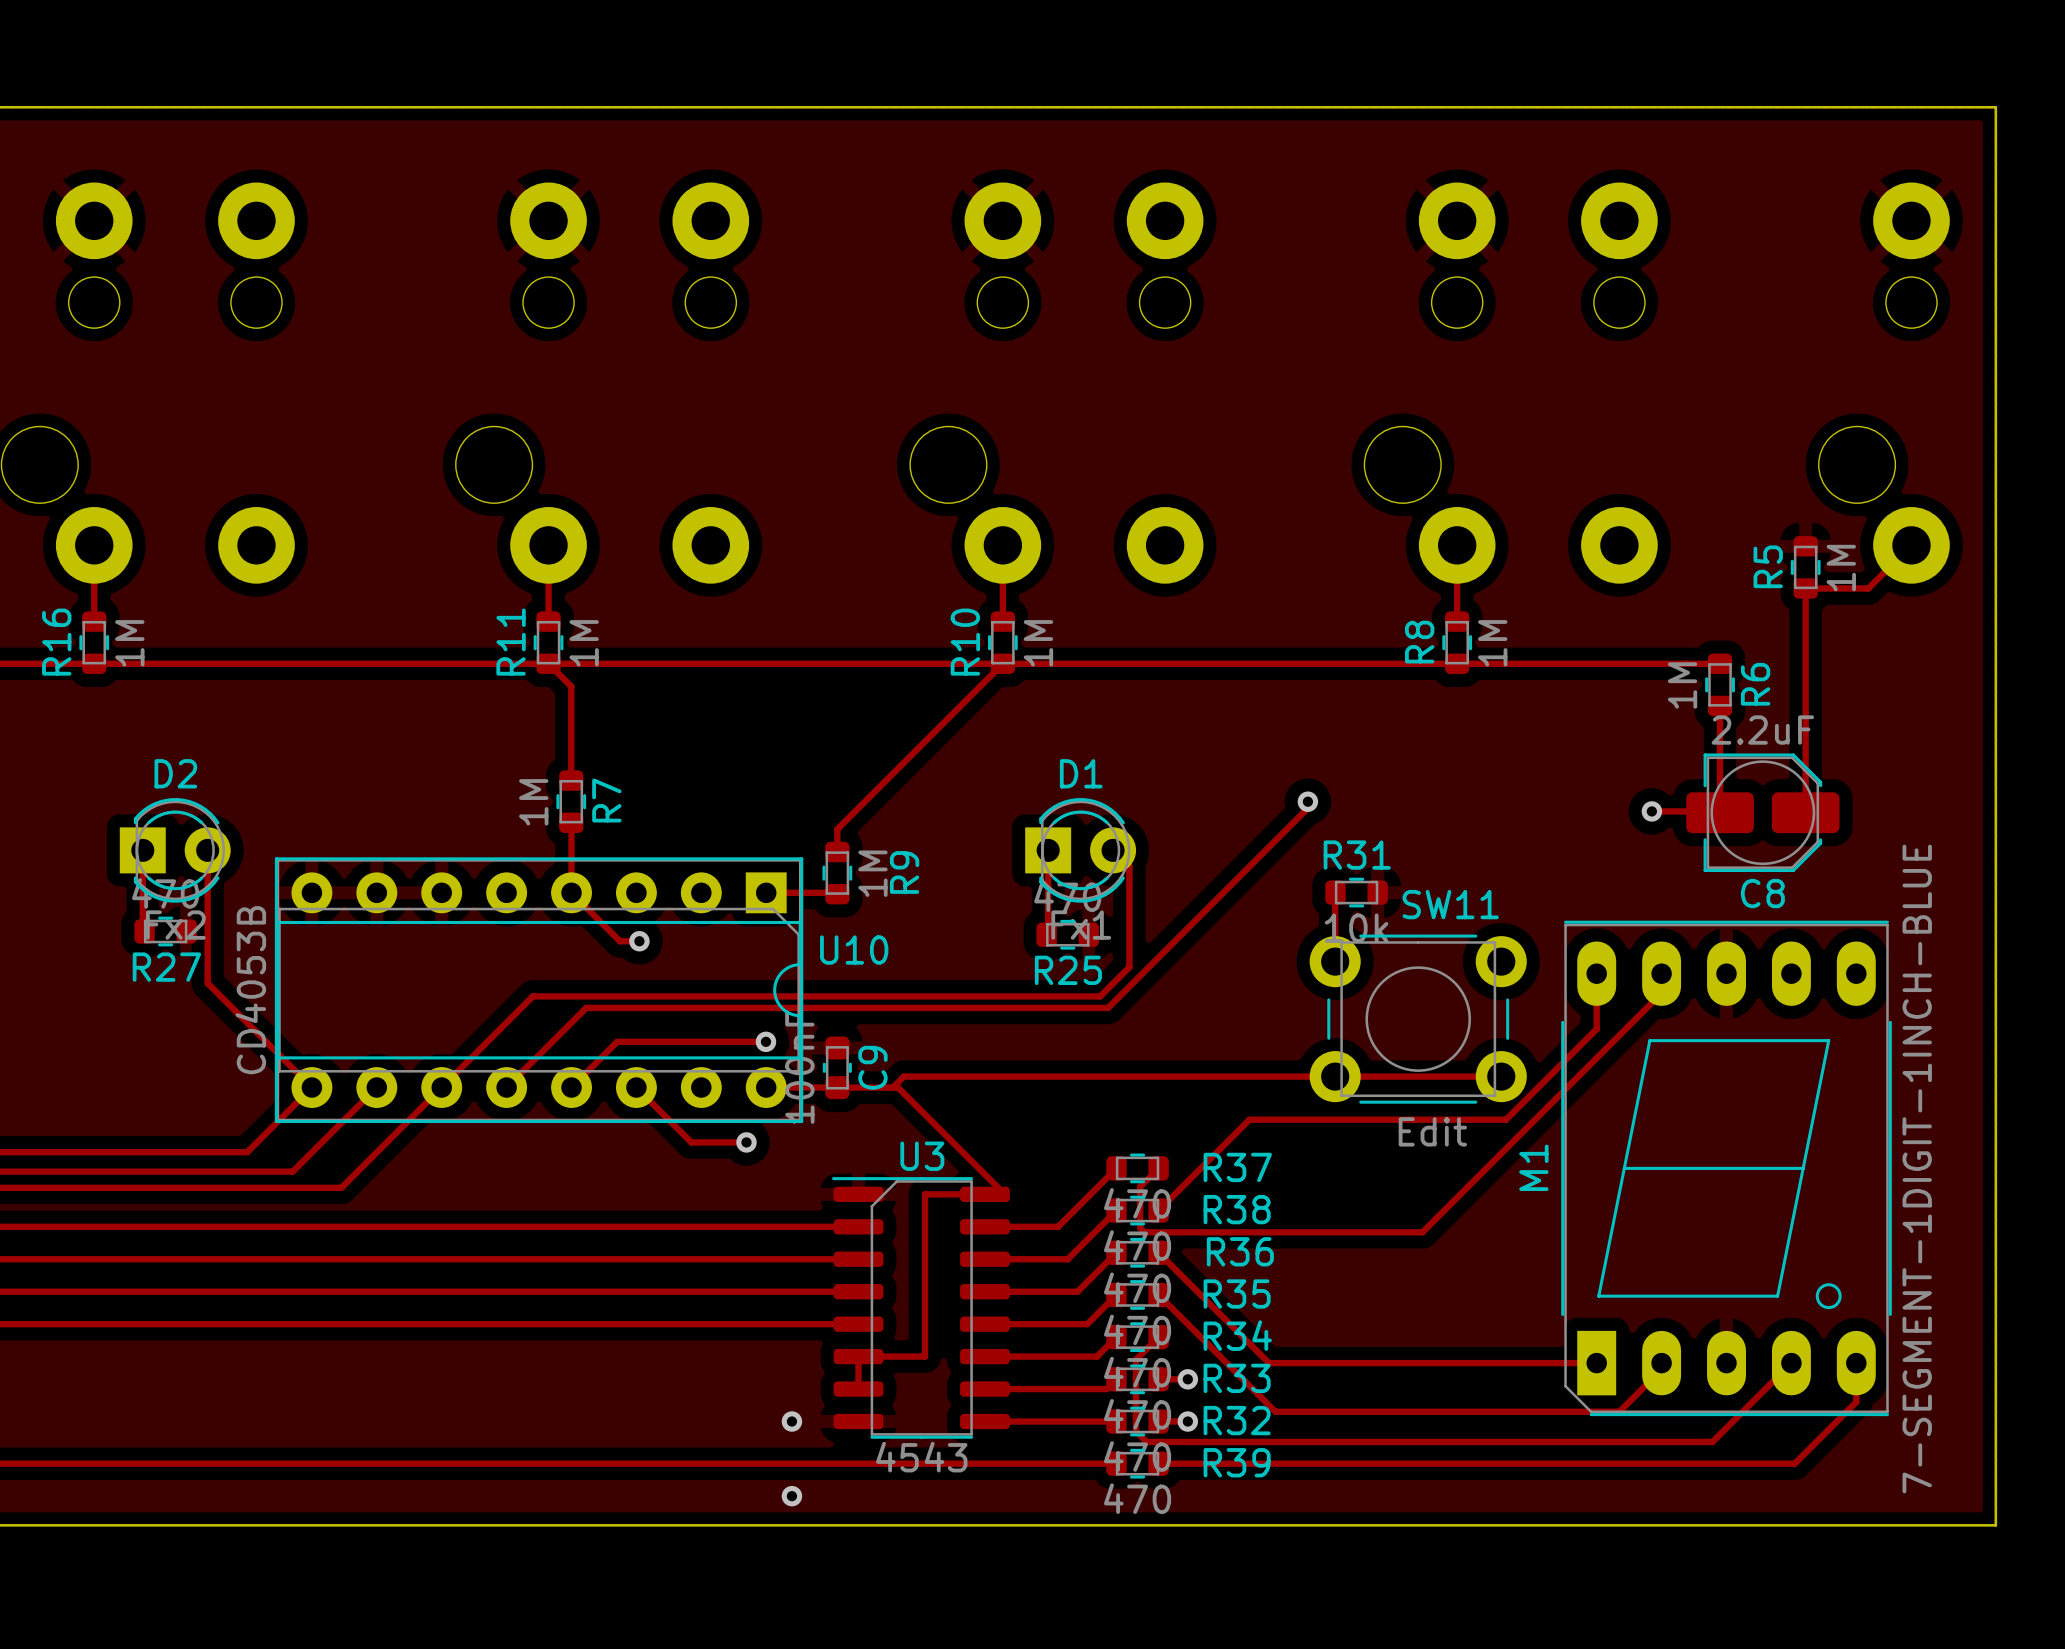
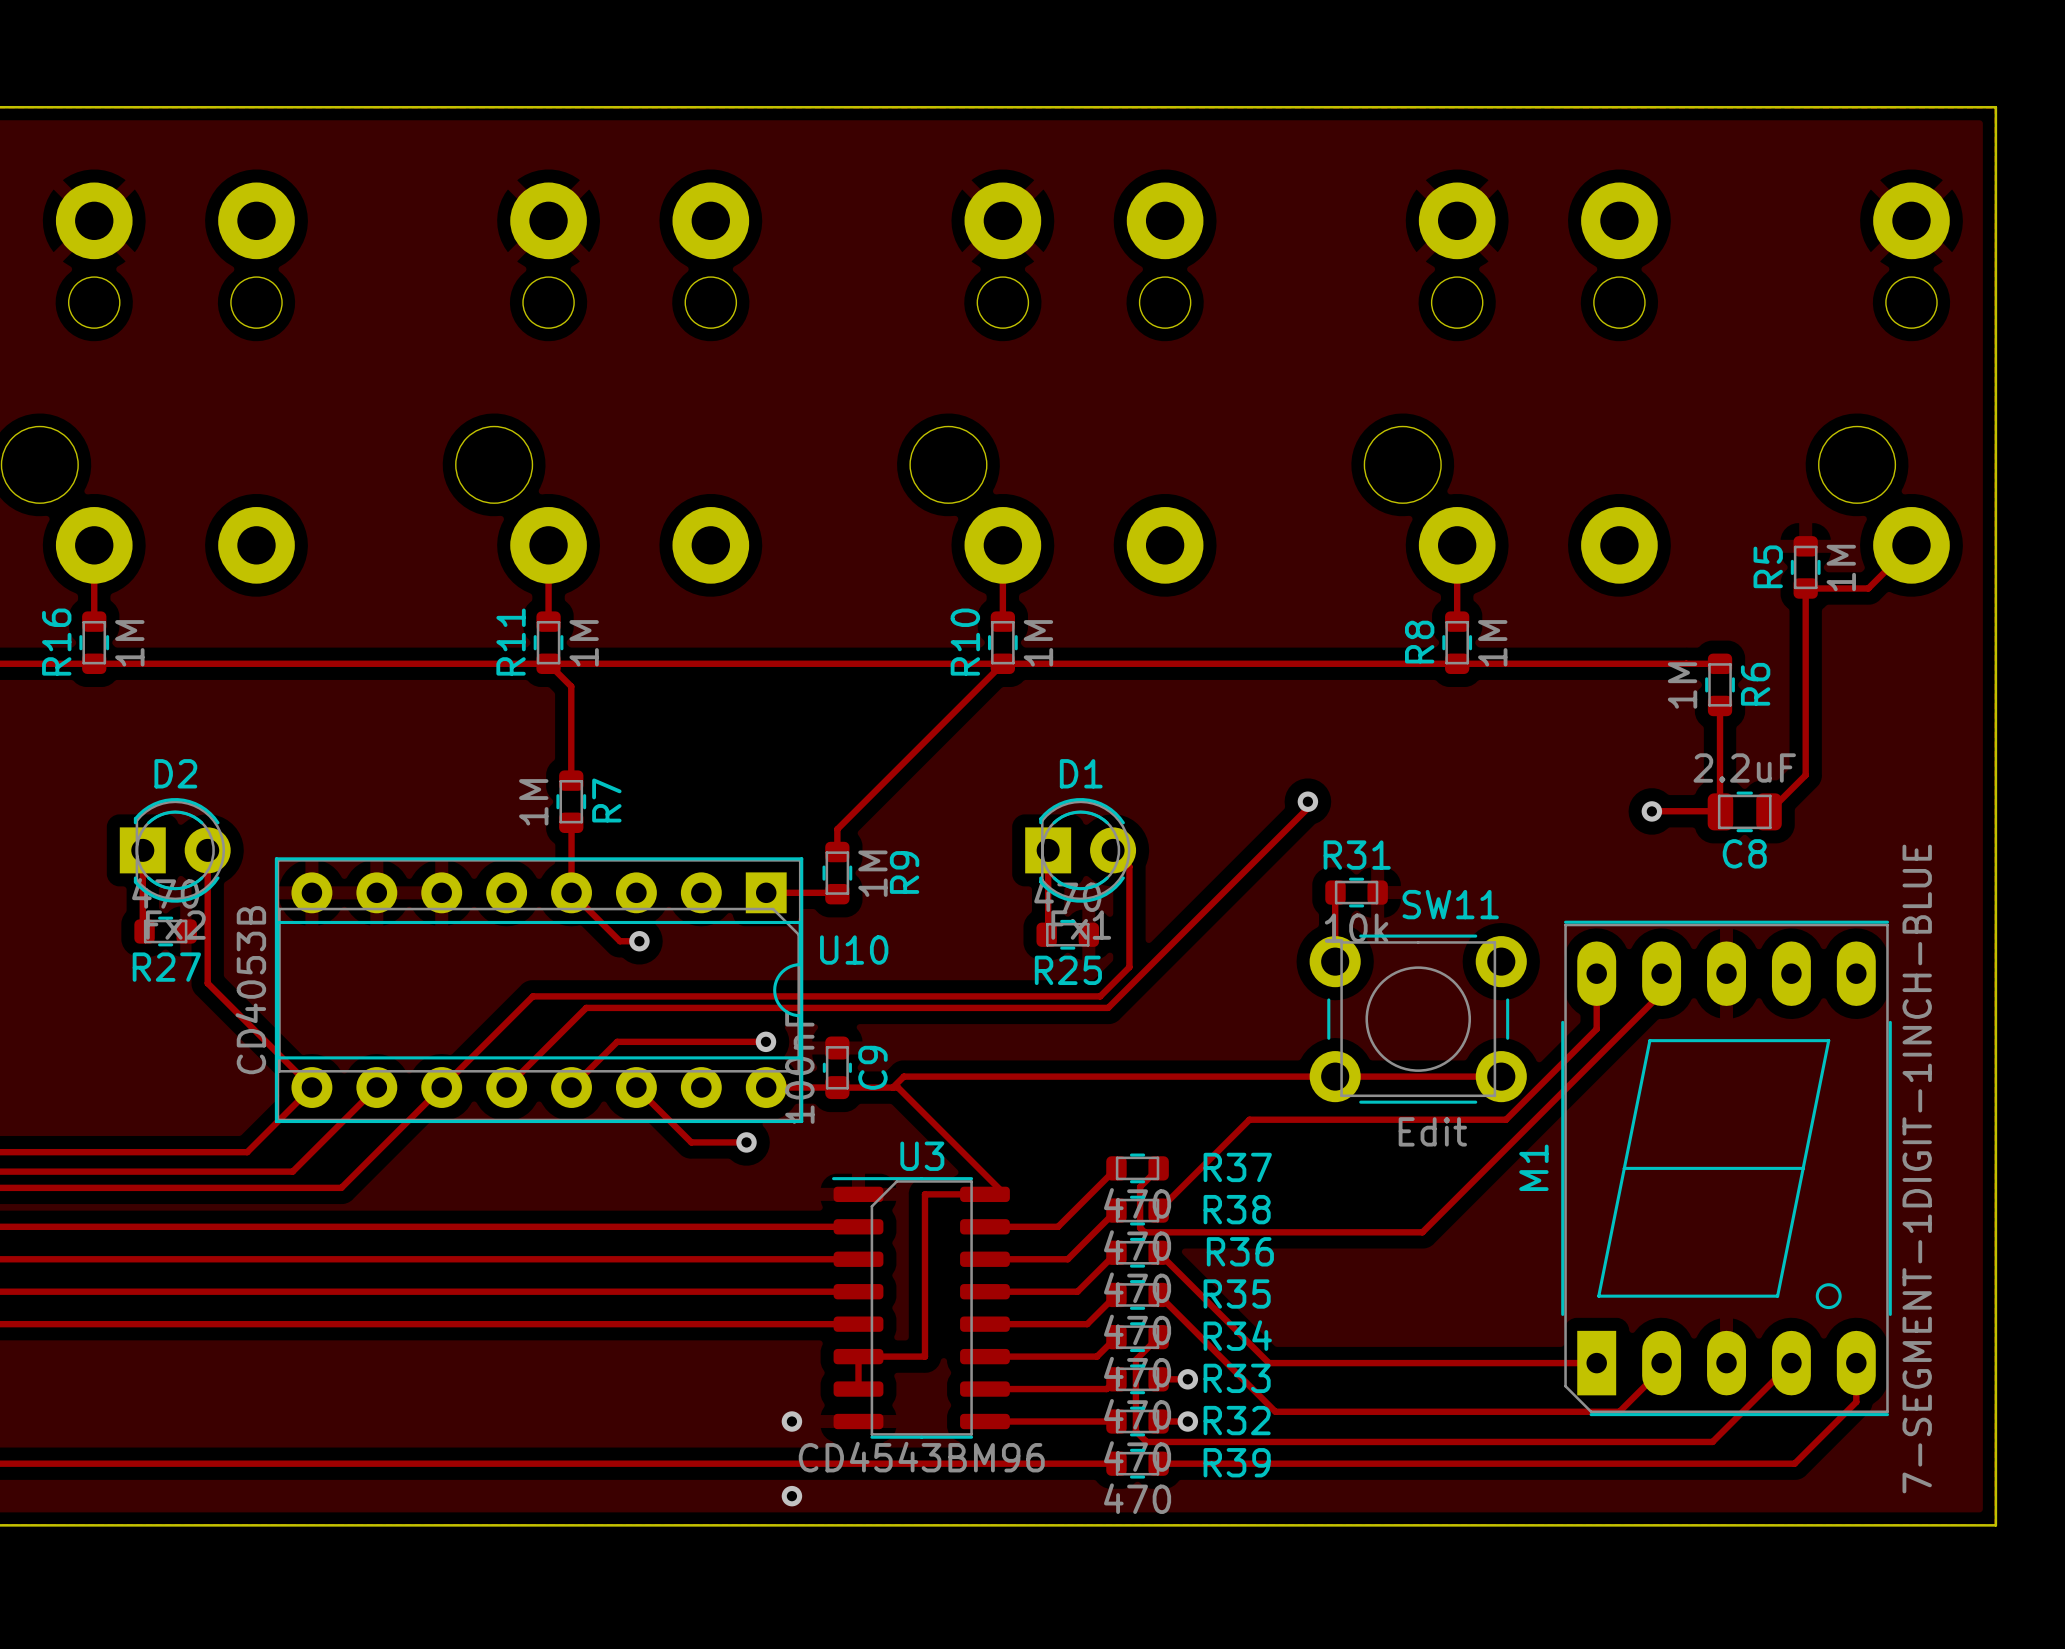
track: (1805, 588) (1805, 812) -> (1805, 588) (1805, 775) (1769, 811)
C8 footprint: [1686, 753, 1840, 873] -> [1707, 791, 1782, 833]
U3 value: 4543 (921, 1457) -> CD4543BM96 (921, 1457)

